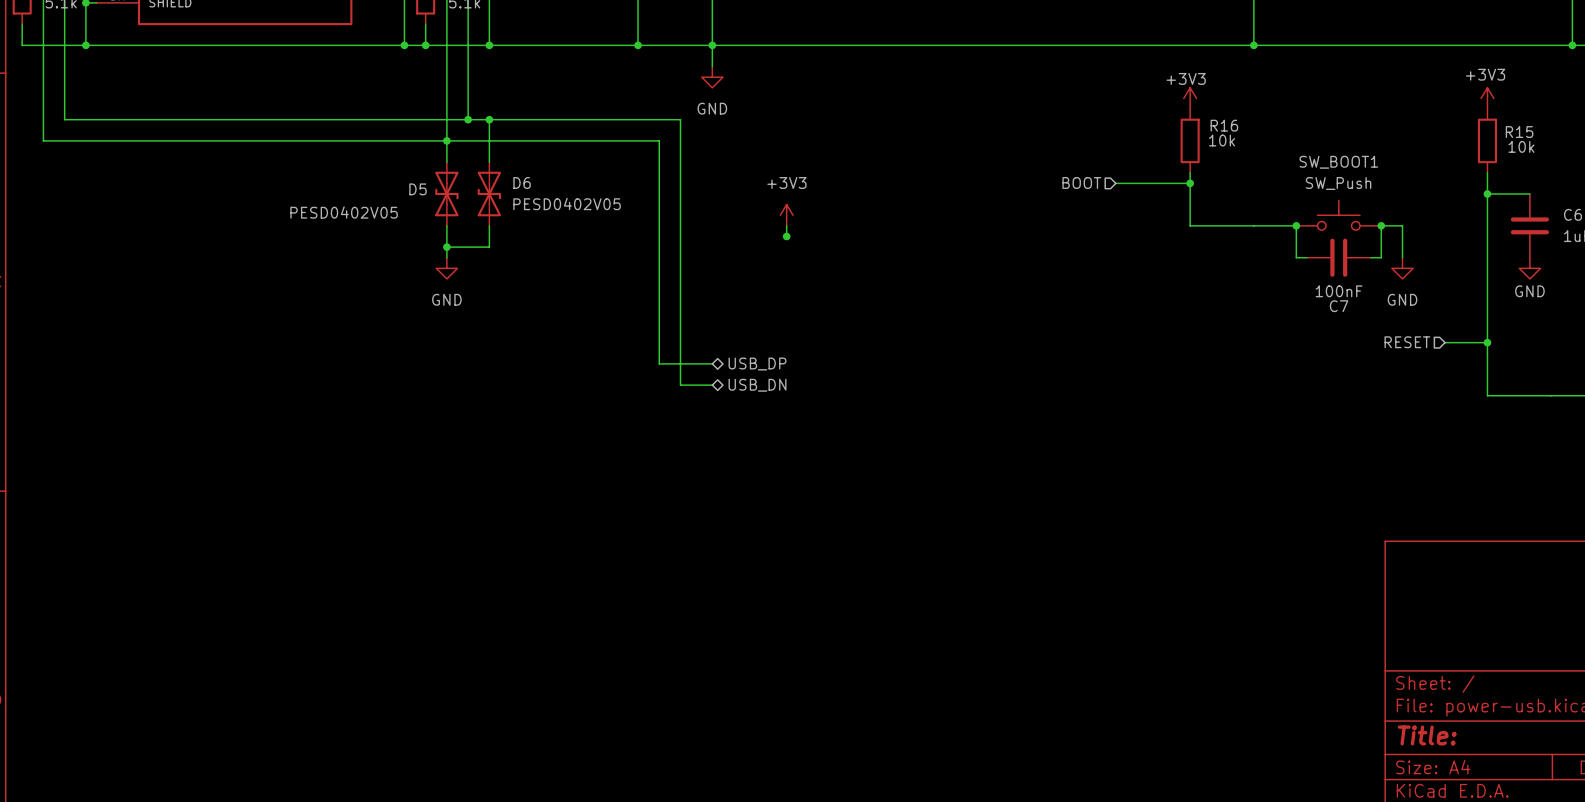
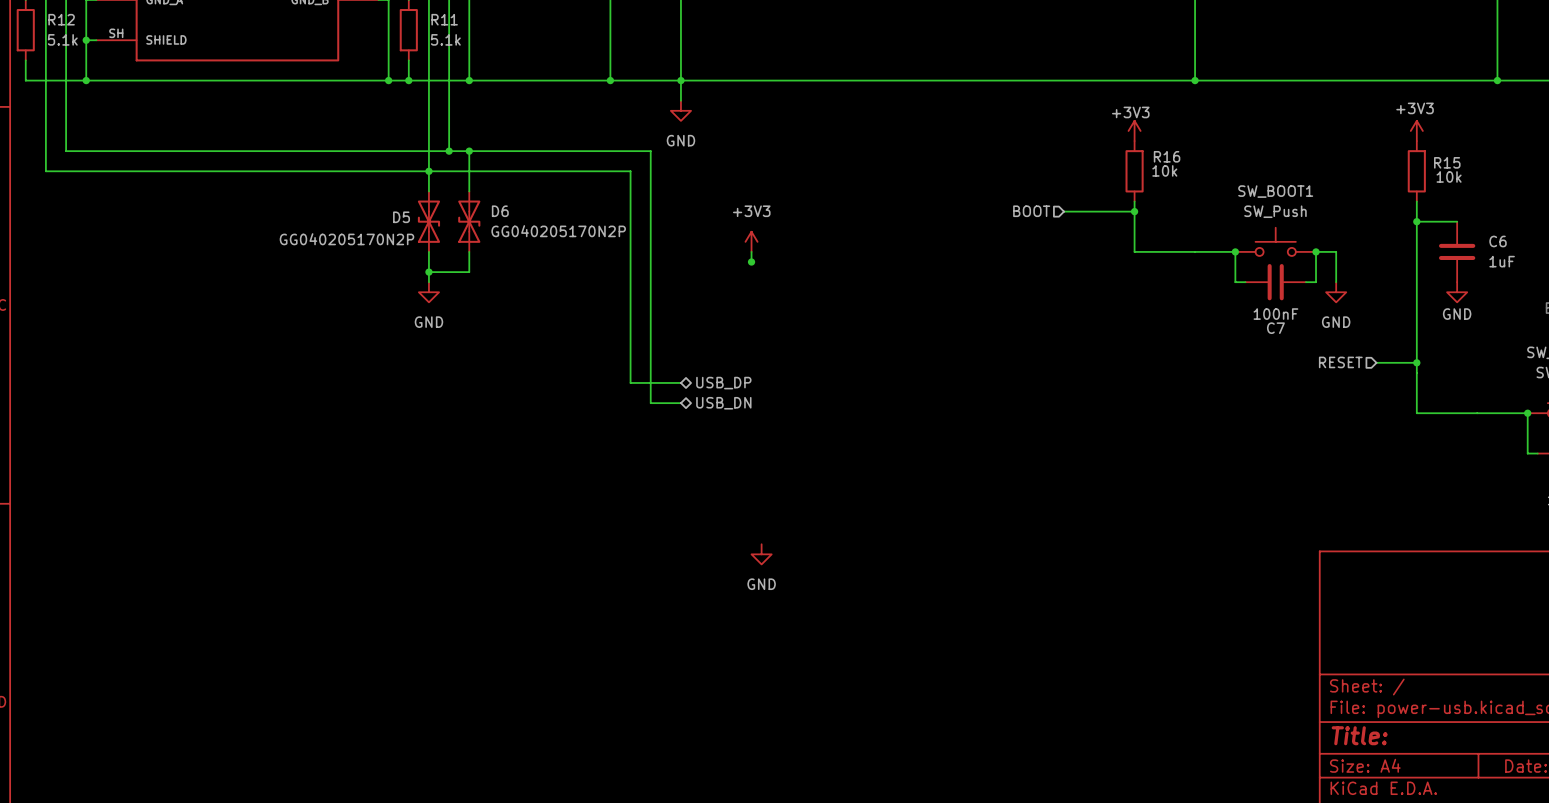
D6 value: PESD0402V05 (567, 203) -> GG040205170N2P (558, 231)
D5 value: PESD0402V05 (344, 212) -> GG040205170N2P (346, 239)
power symbol: none -> GND (761, 554)

